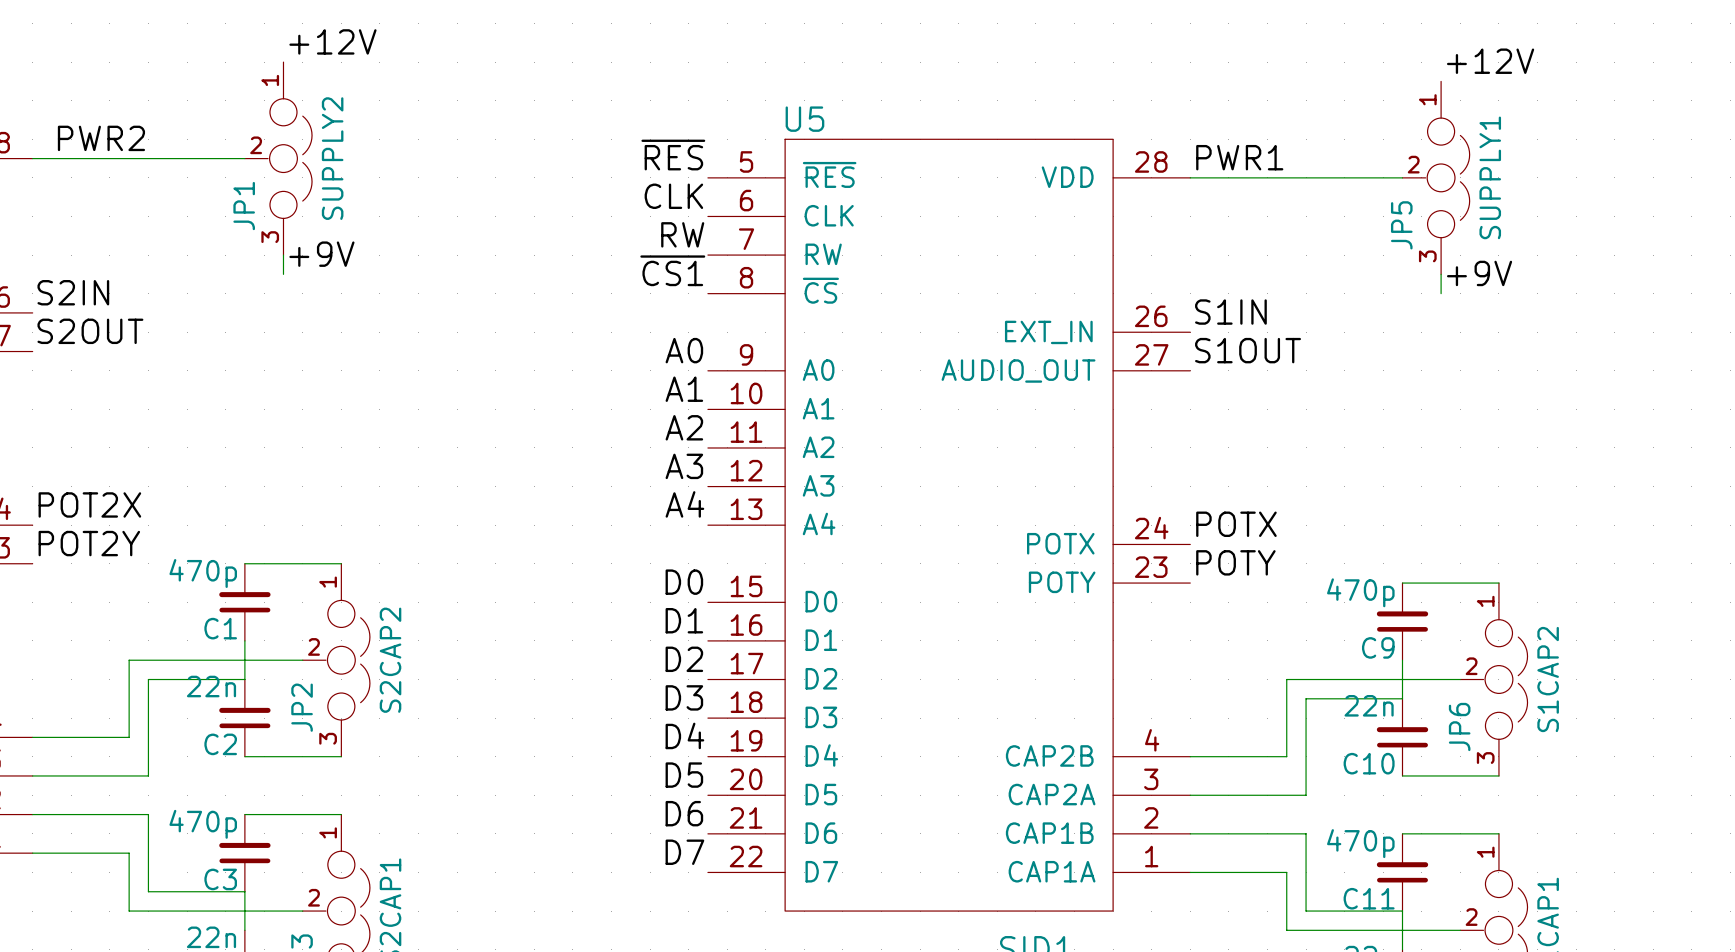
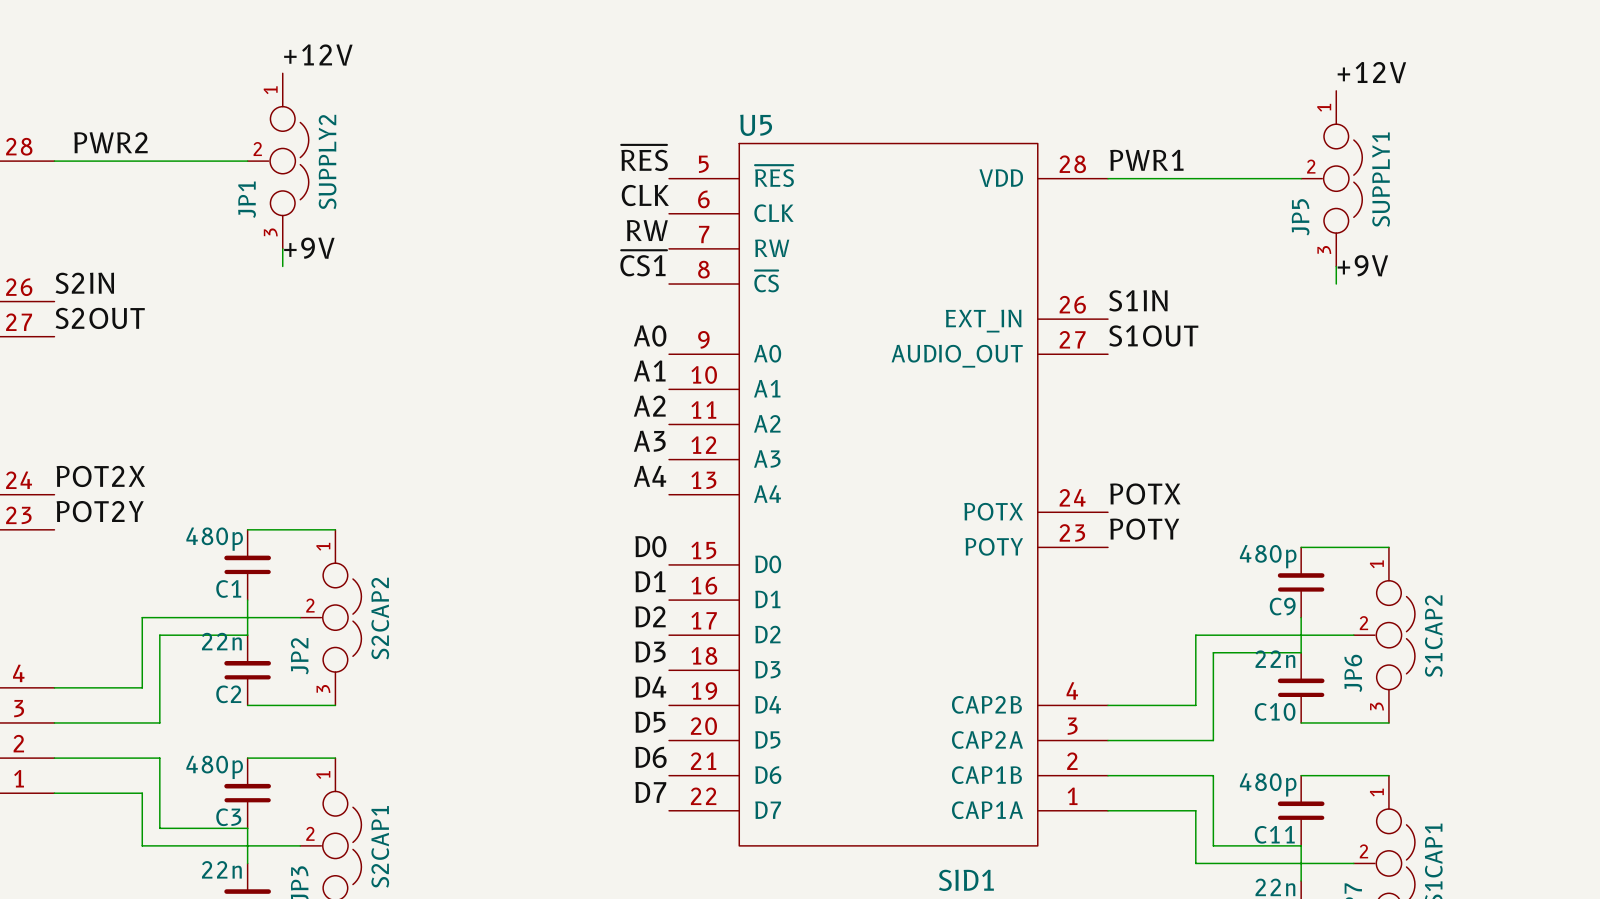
C1 value: 470p (203, 573) -> 480p (214, 539)
C9 value: 470p (1360, 592) -> 480p (1268, 556)
C3 value: 470p (203, 824) -> 480p (214, 767)
C11 value: 470p (1360, 843) -> 480p (1268, 784)

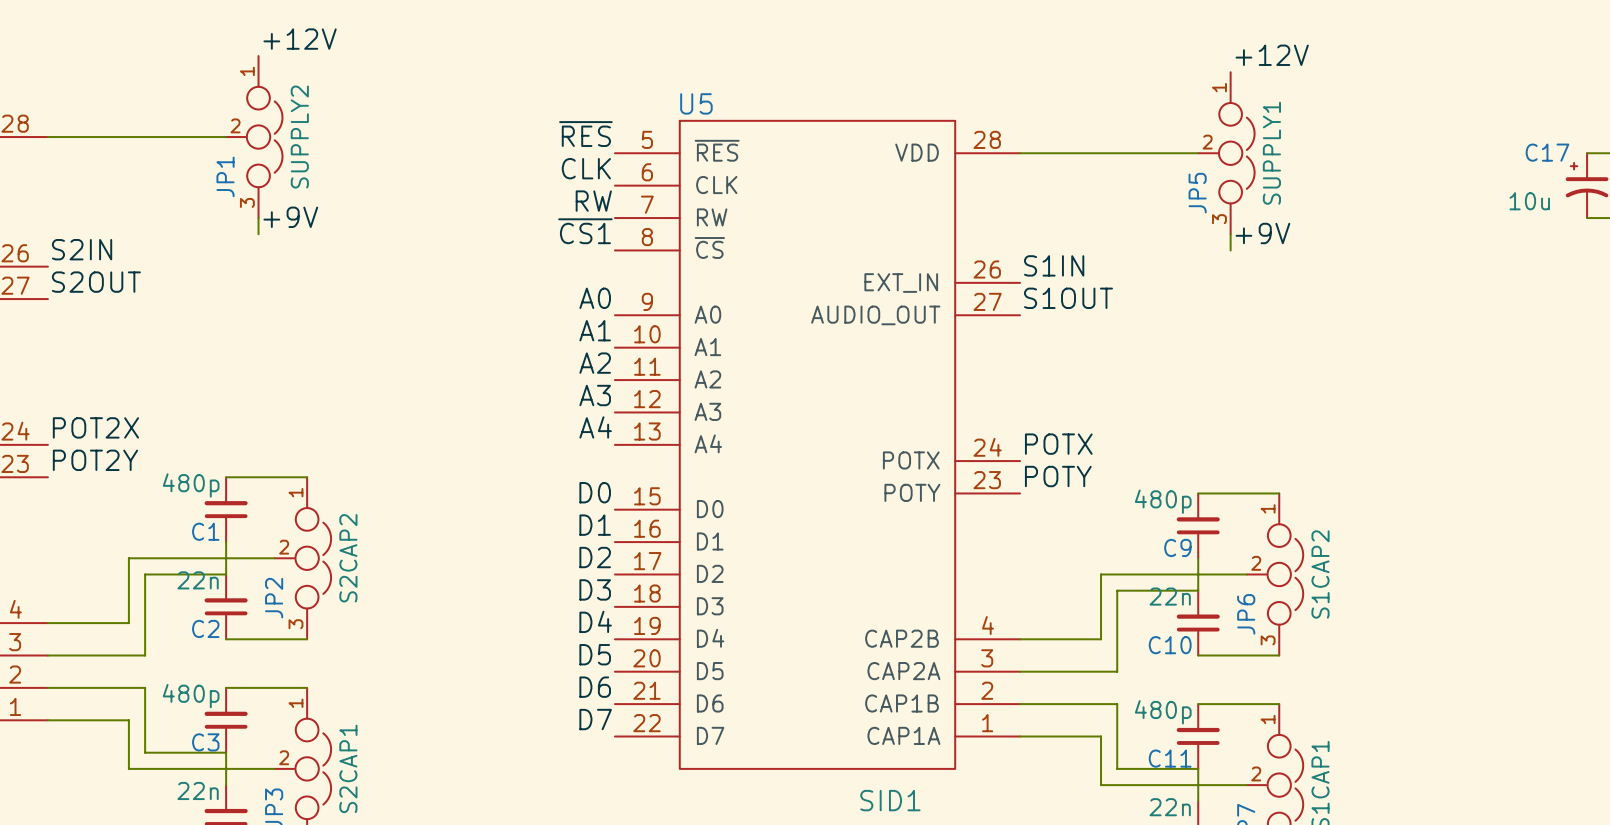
label: PWR2 (110, 142) -> none
label: PWR1 (1146, 160) -> none

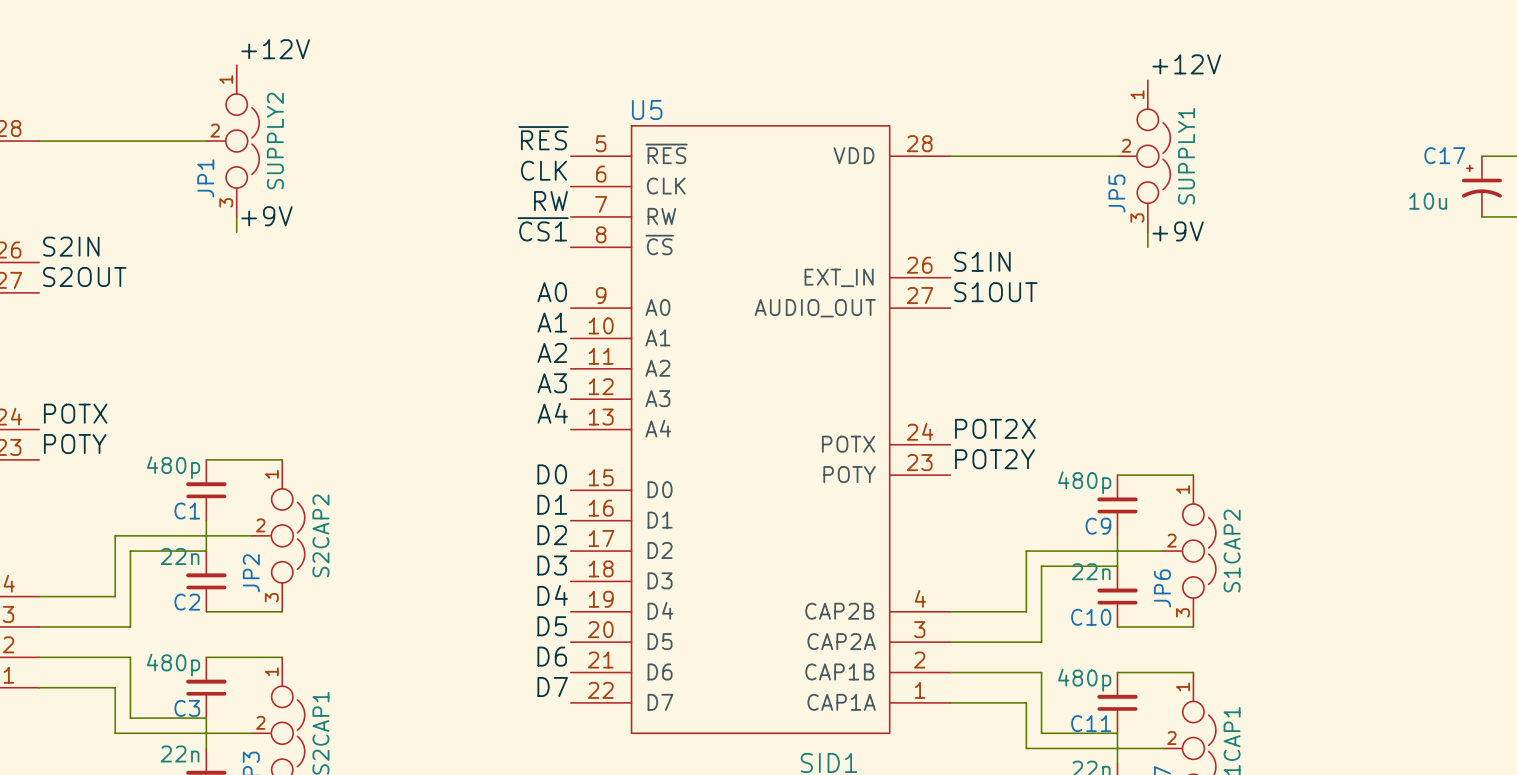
label: POT2X (95, 427) -> POTX (75, 413)
label: POTX (1058, 444) -> POT2X (995, 428)
label: POT2Y (95, 460) -> POTY (75, 444)
label: POTY (1058, 476) -> POT2Y (995, 459)

